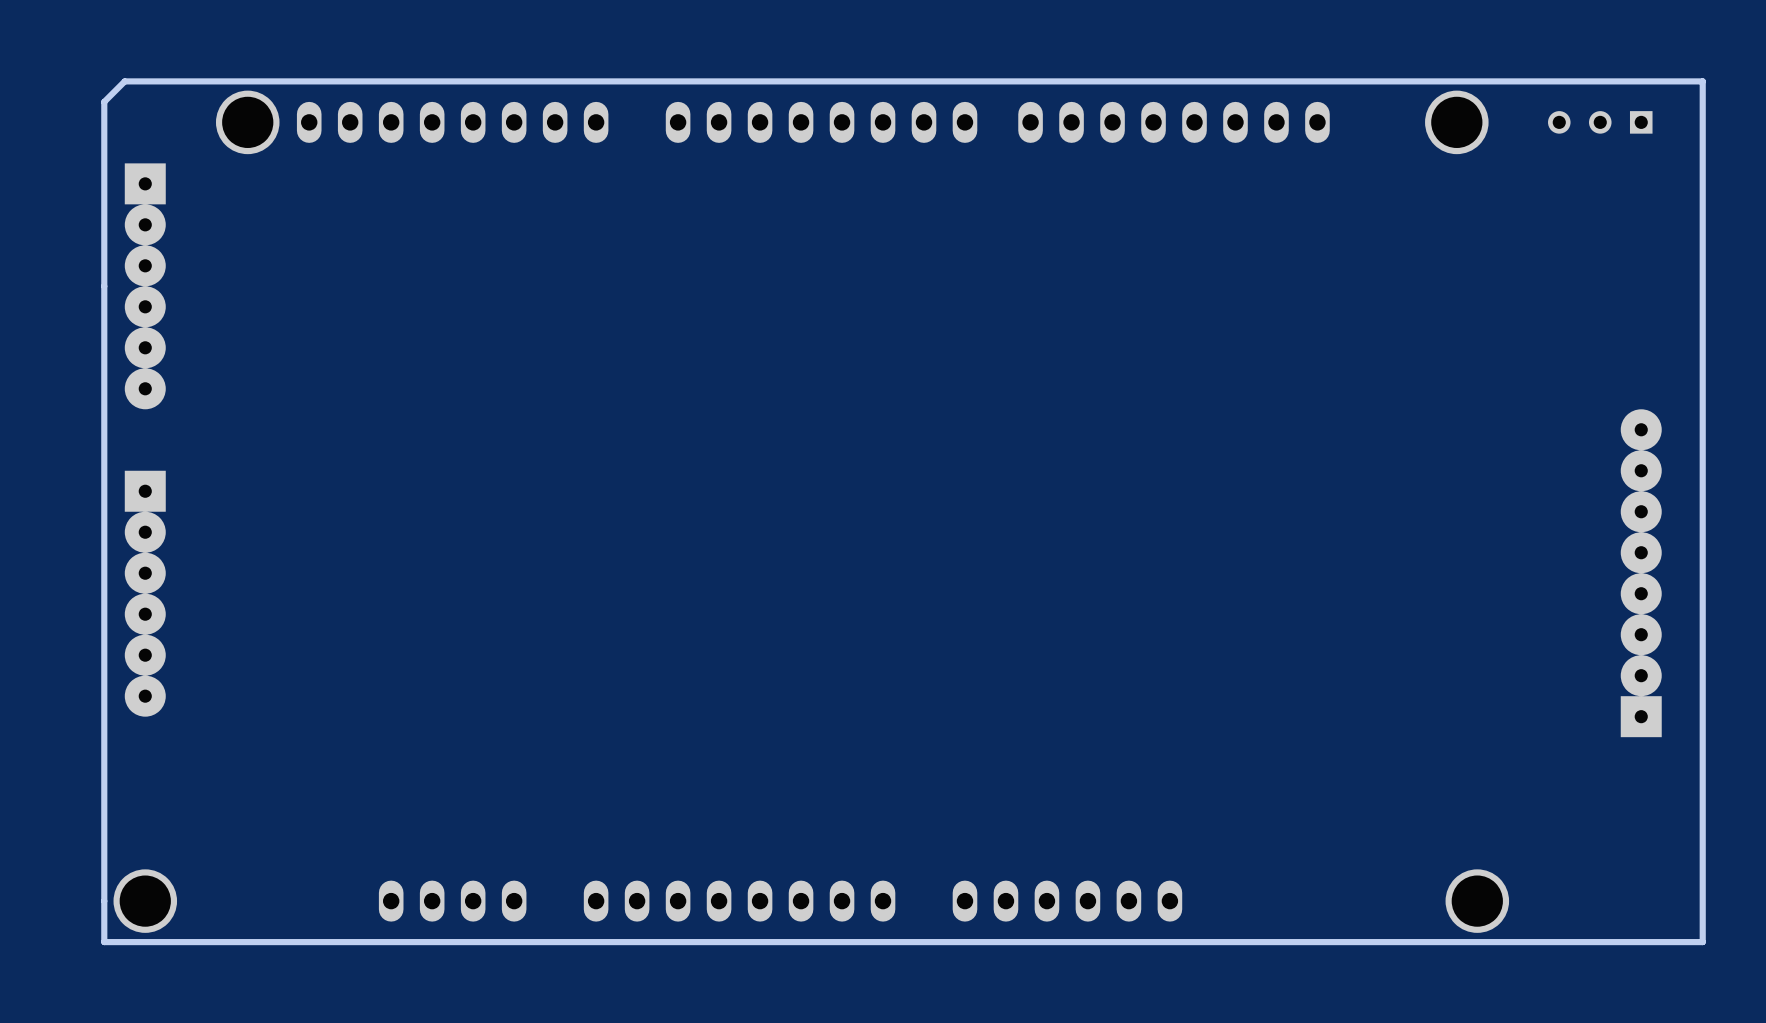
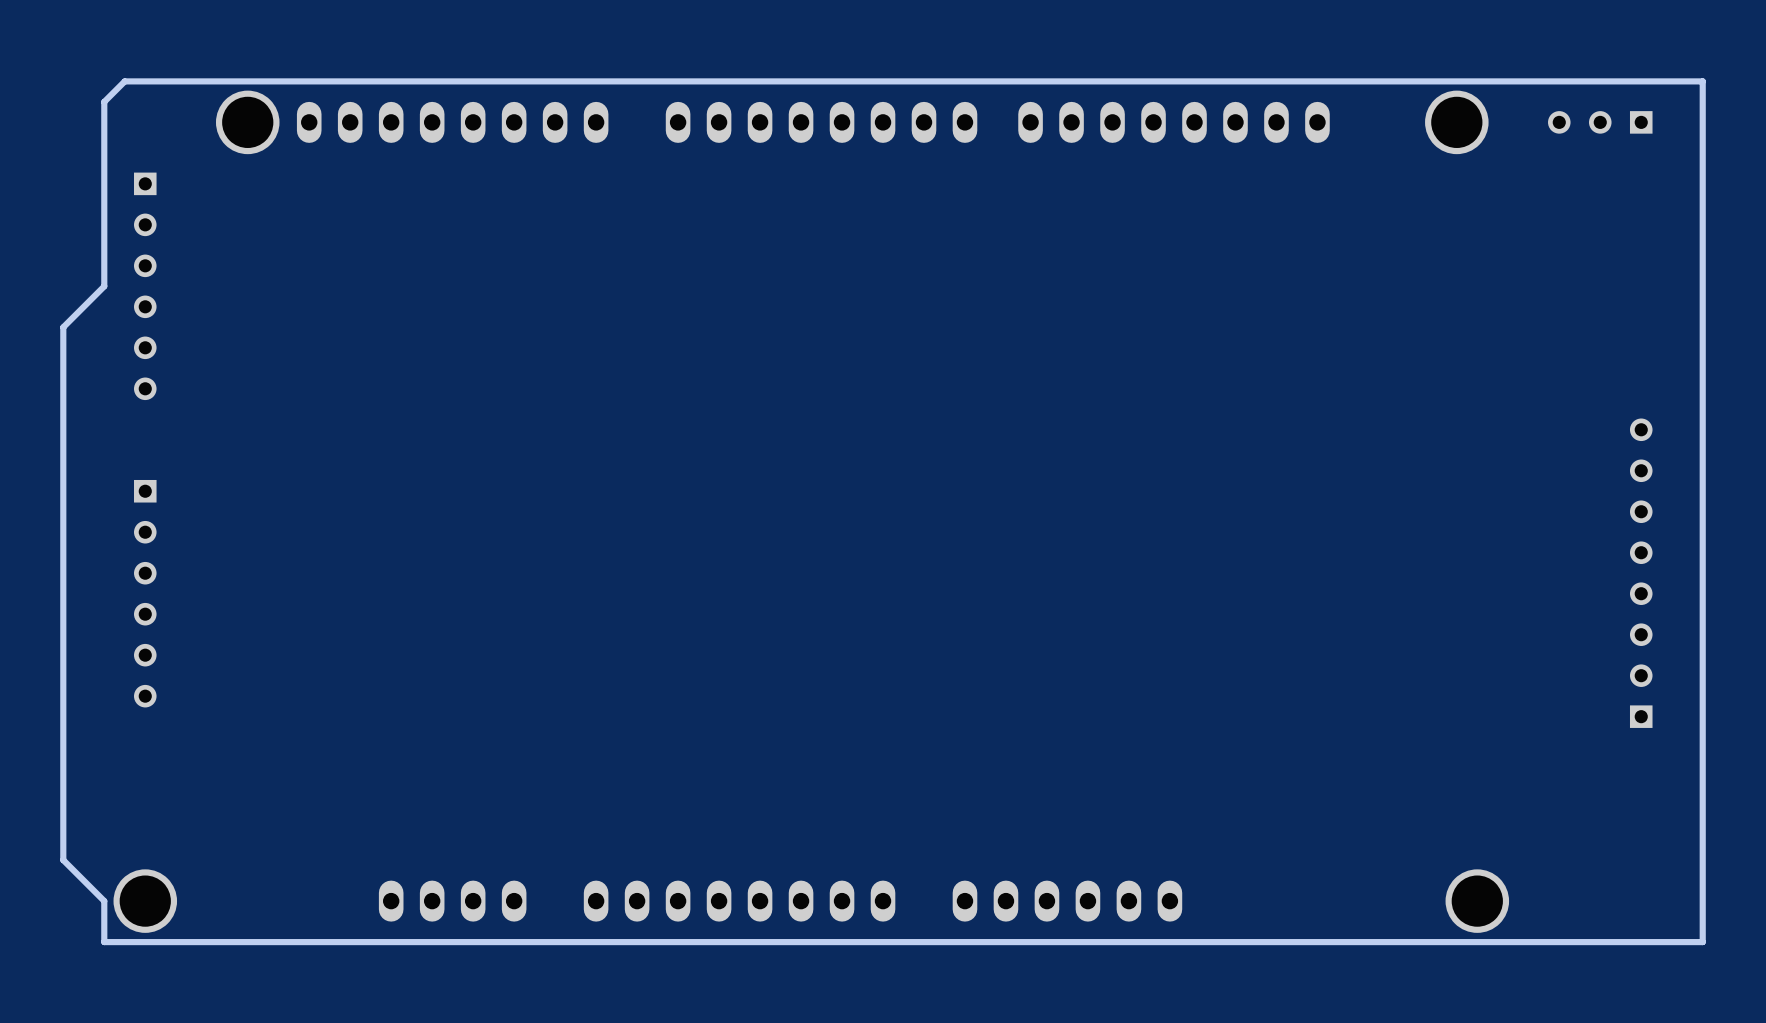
part footprint: [124, 163, 166, 410] -> [134, 172, 157, 401]
board edge: (104, 286) (104, 901) -> (104, 286) (63, 327) (63, 860) (104, 901)
part footprint: [1620, 409, 1662, 738] -> [1629, 418, 1653, 728]
part footprint: [124, 470, 166, 717] -> [134, 479, 157, 708]

